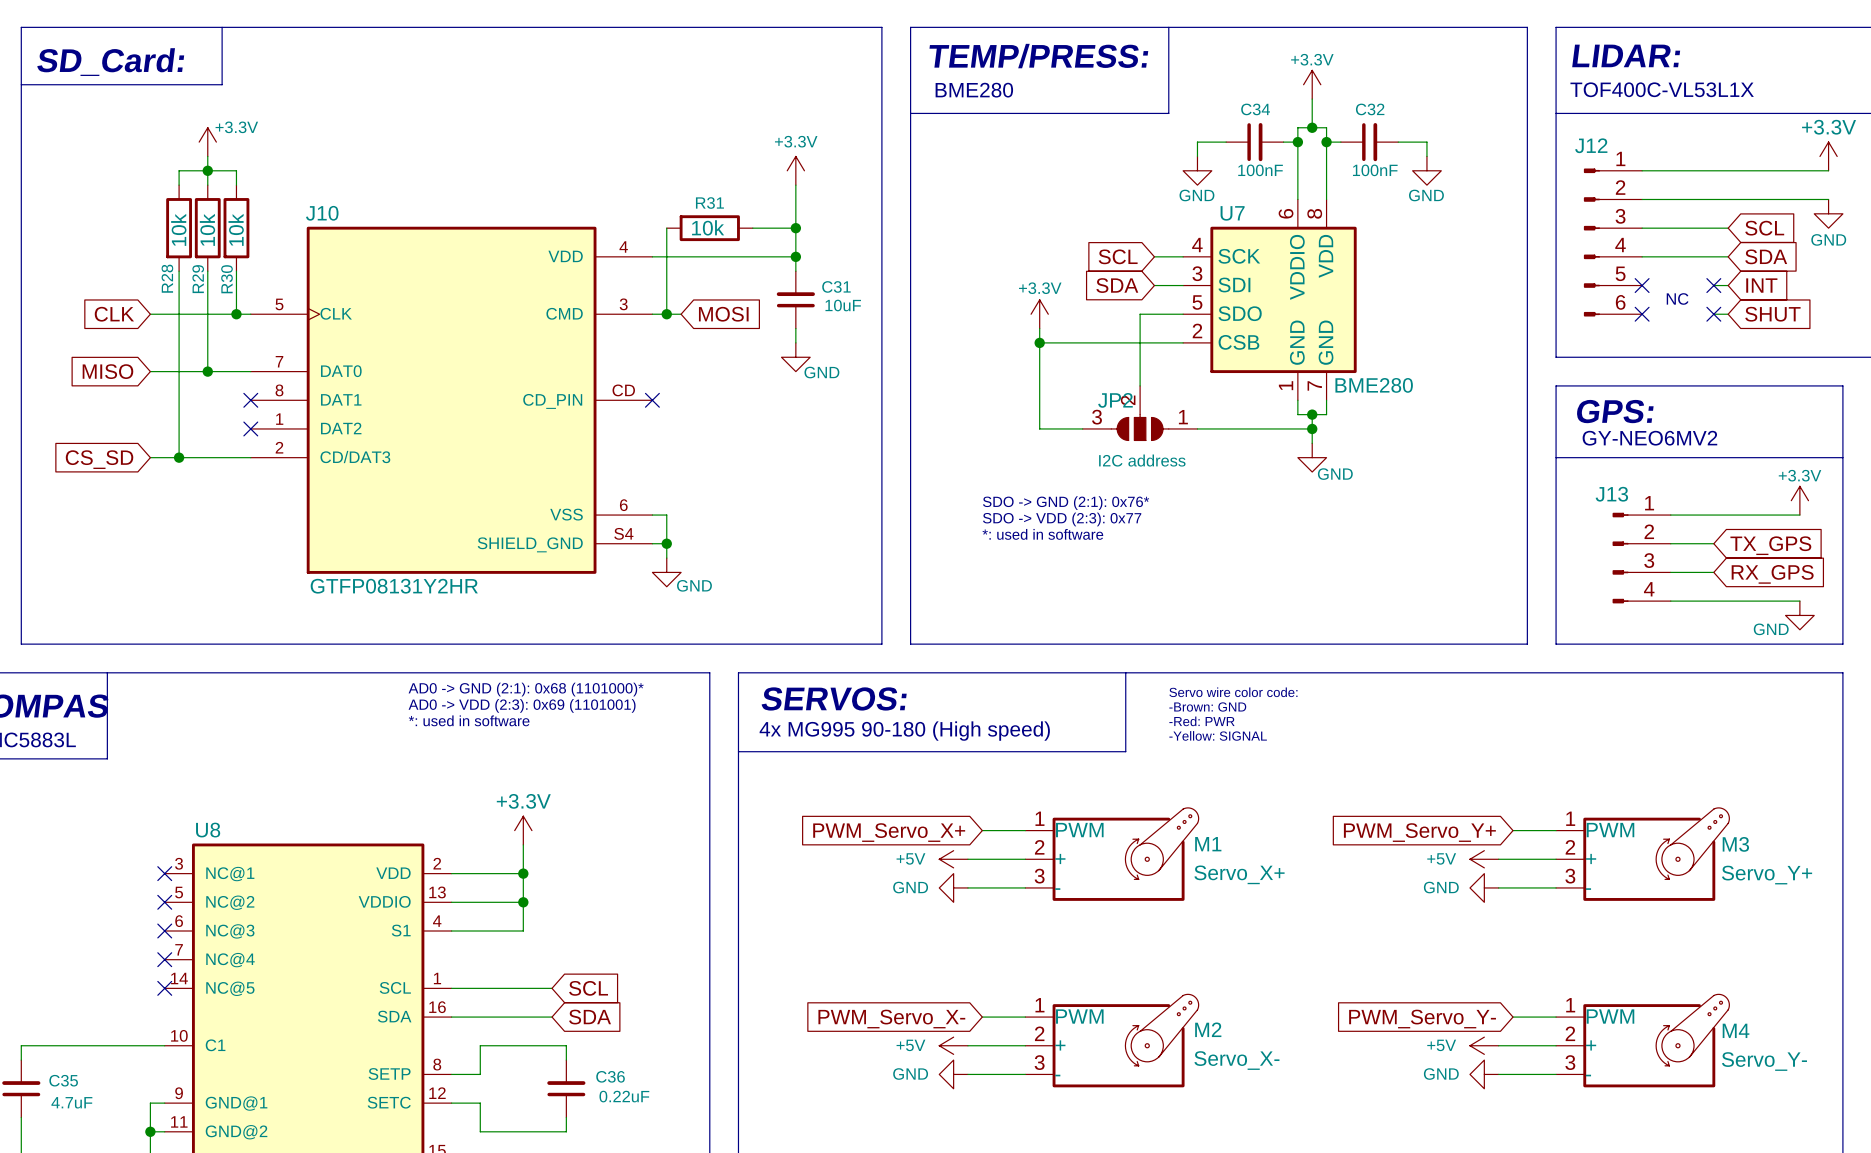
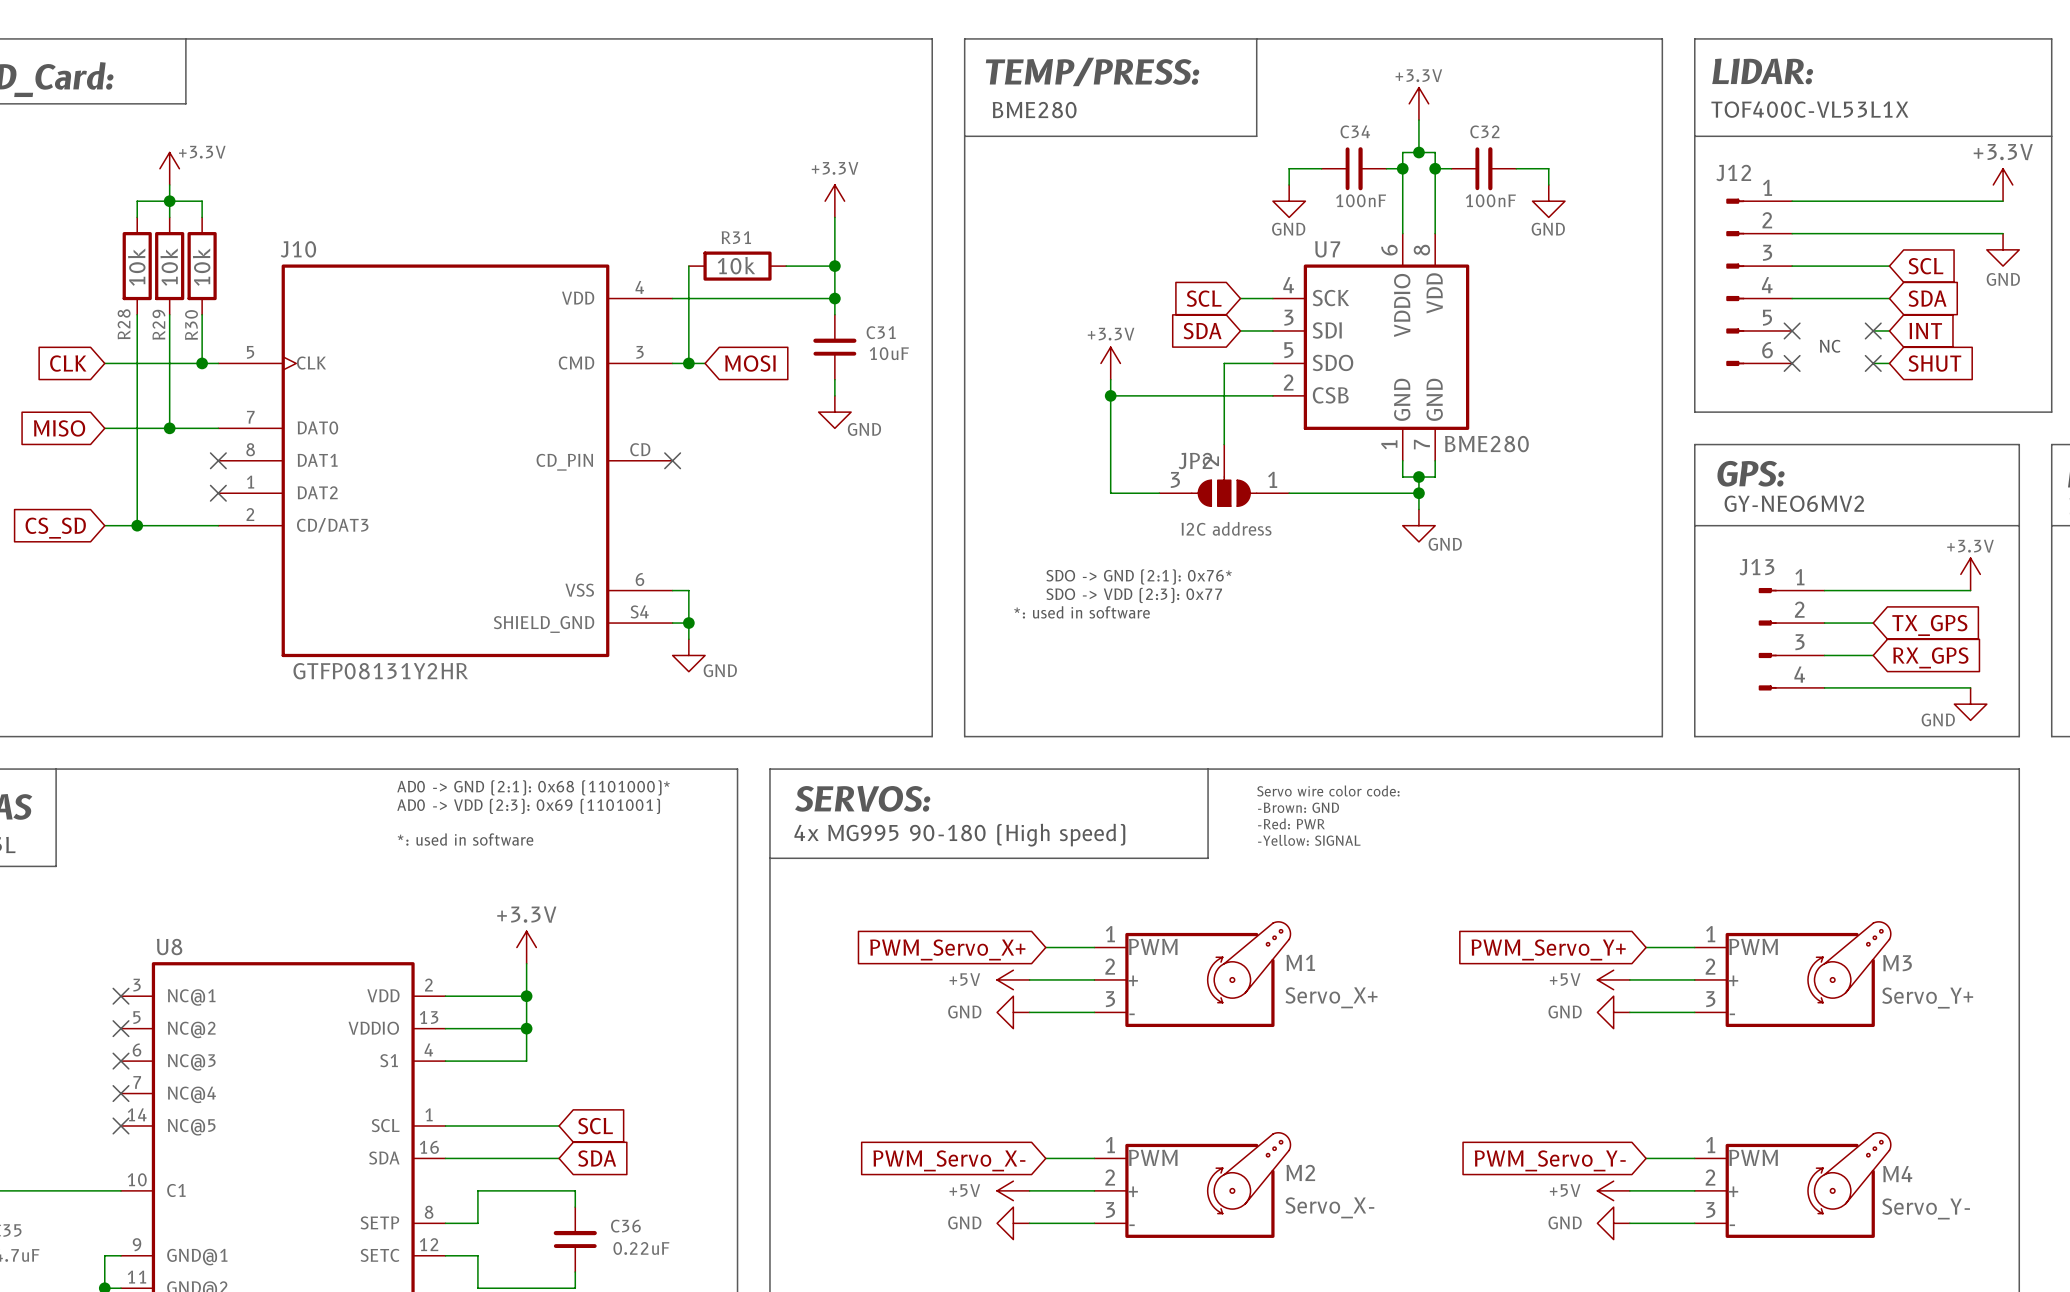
text position: *: used in software (1042, 534) -> *: used in software (1082, 612)
text position: *: used in software (469, 720) -> *: used in software (465, 839)

